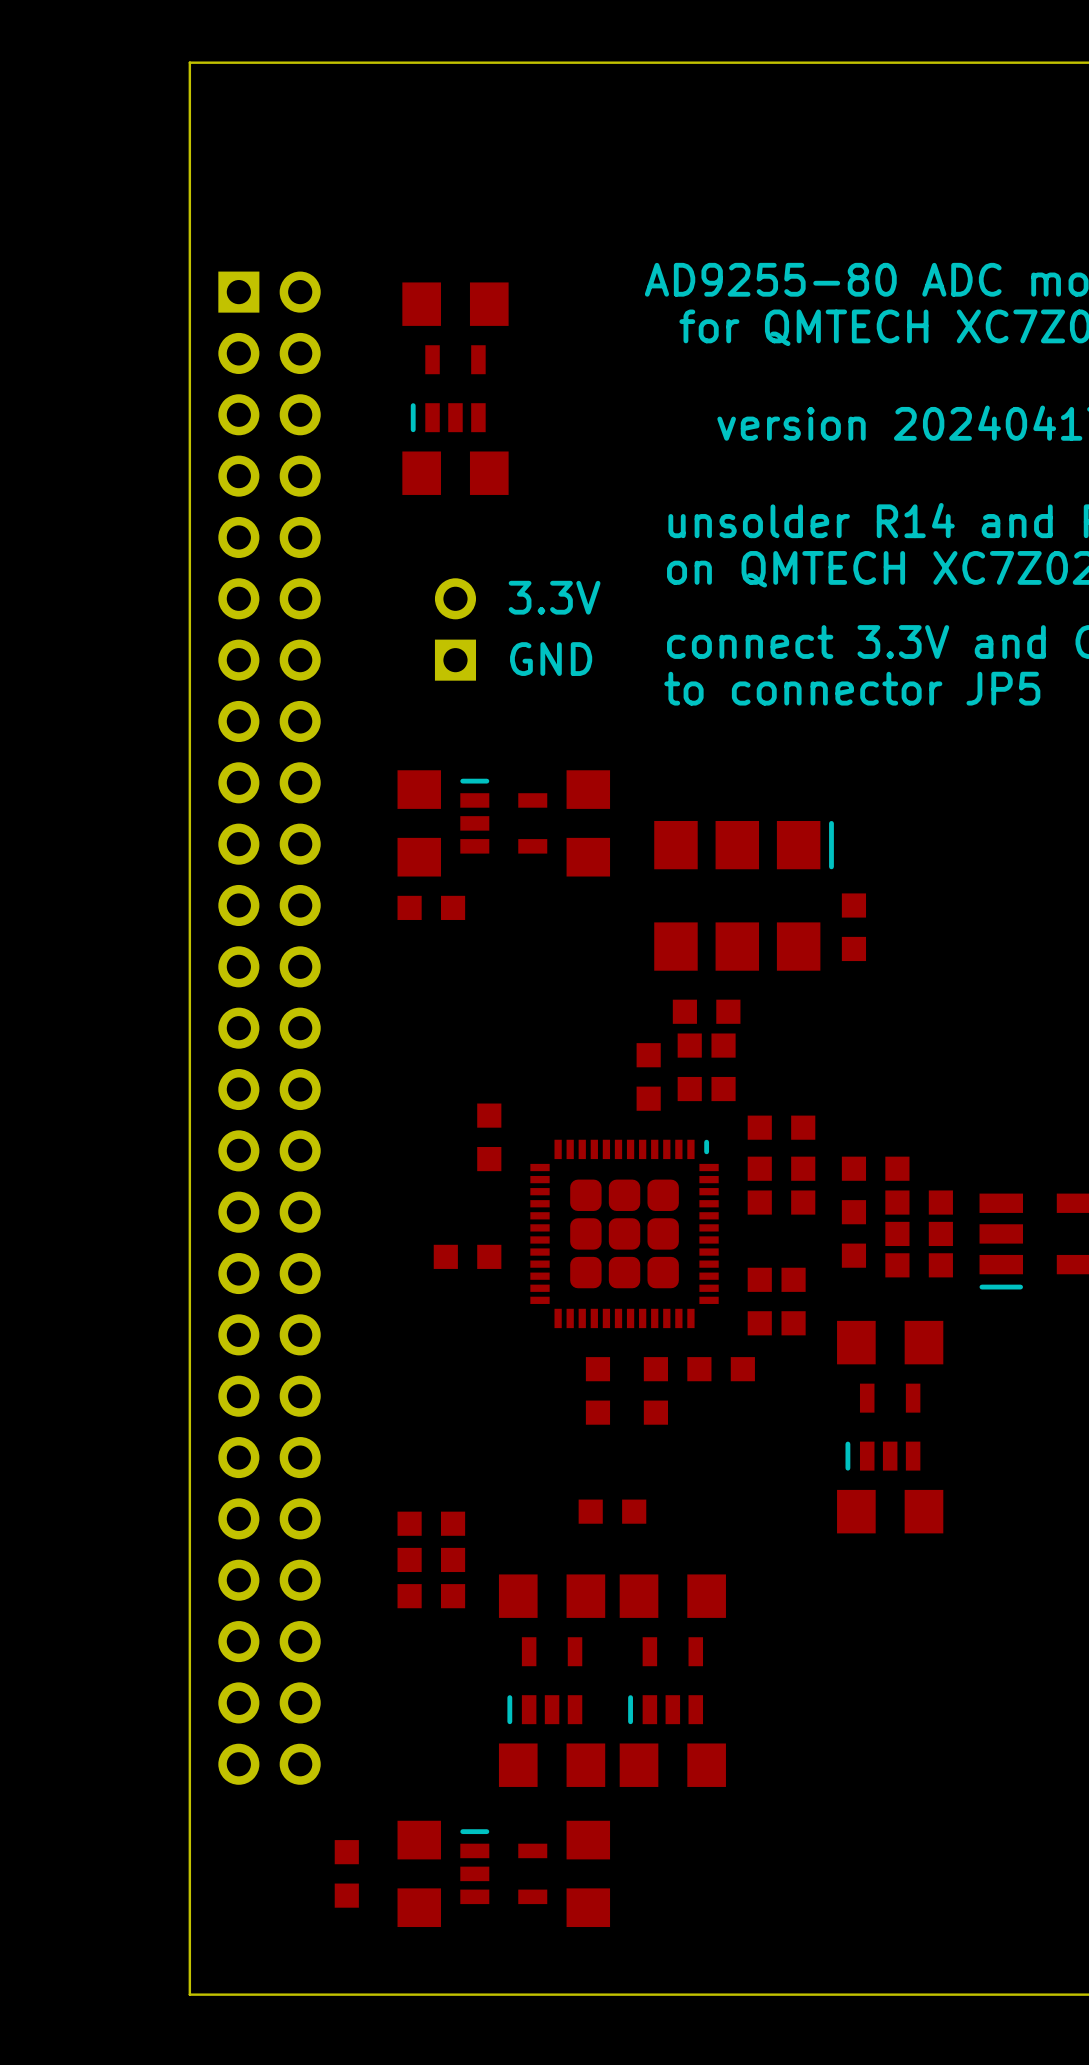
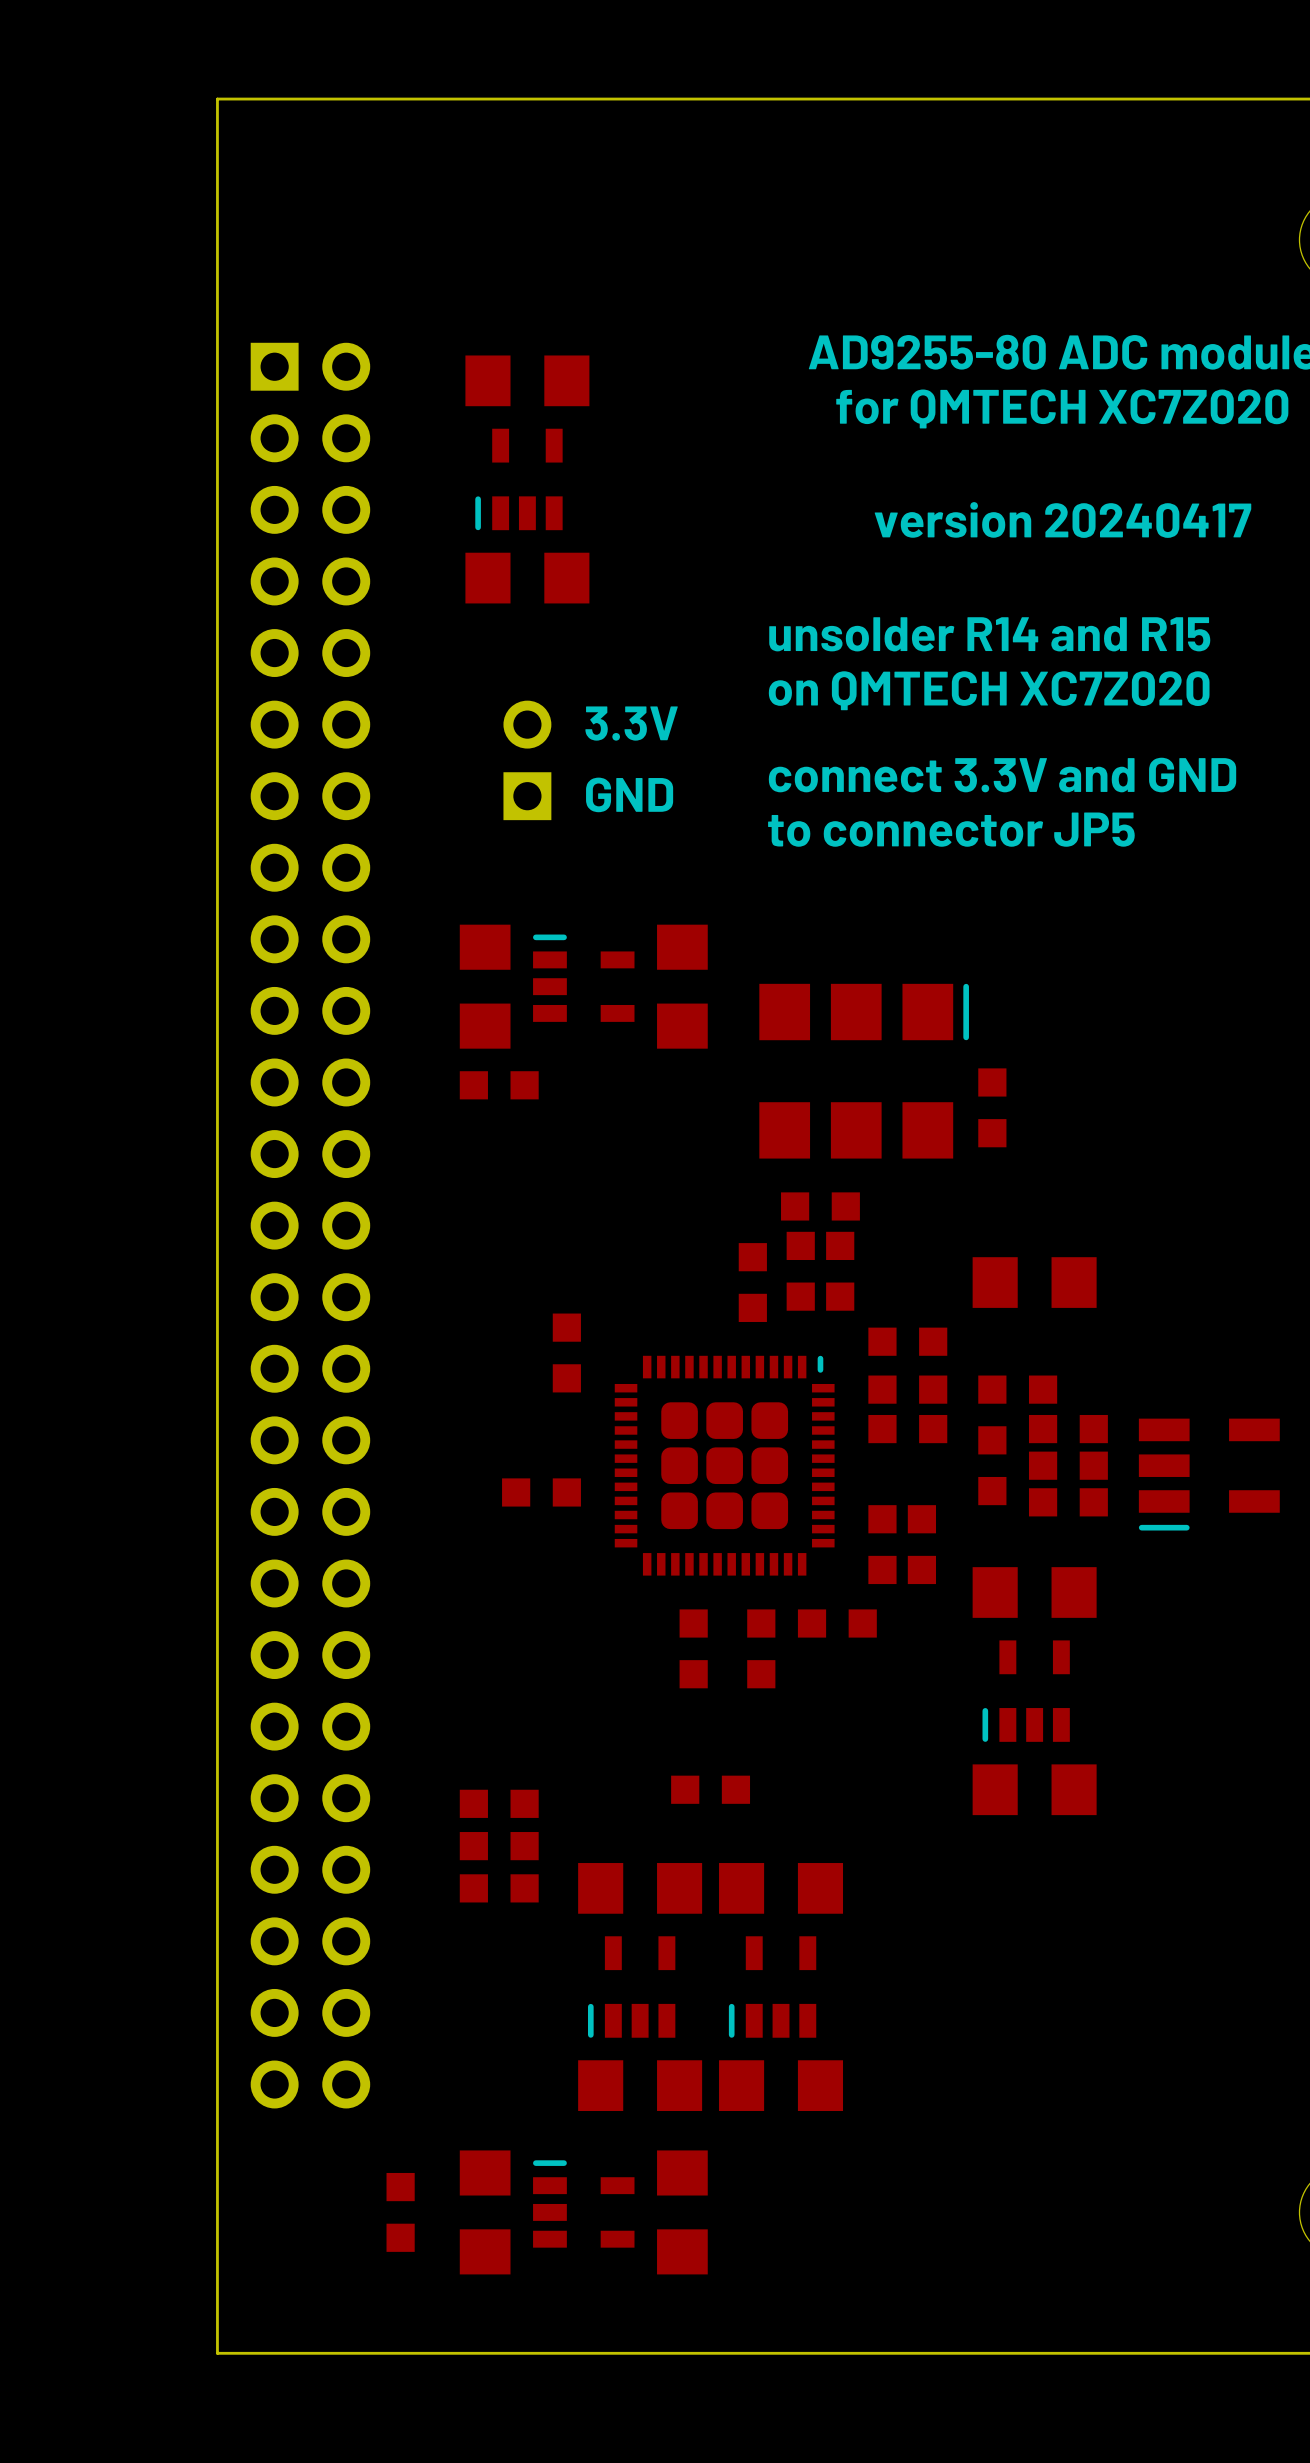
part: none -> (1034, 1282)

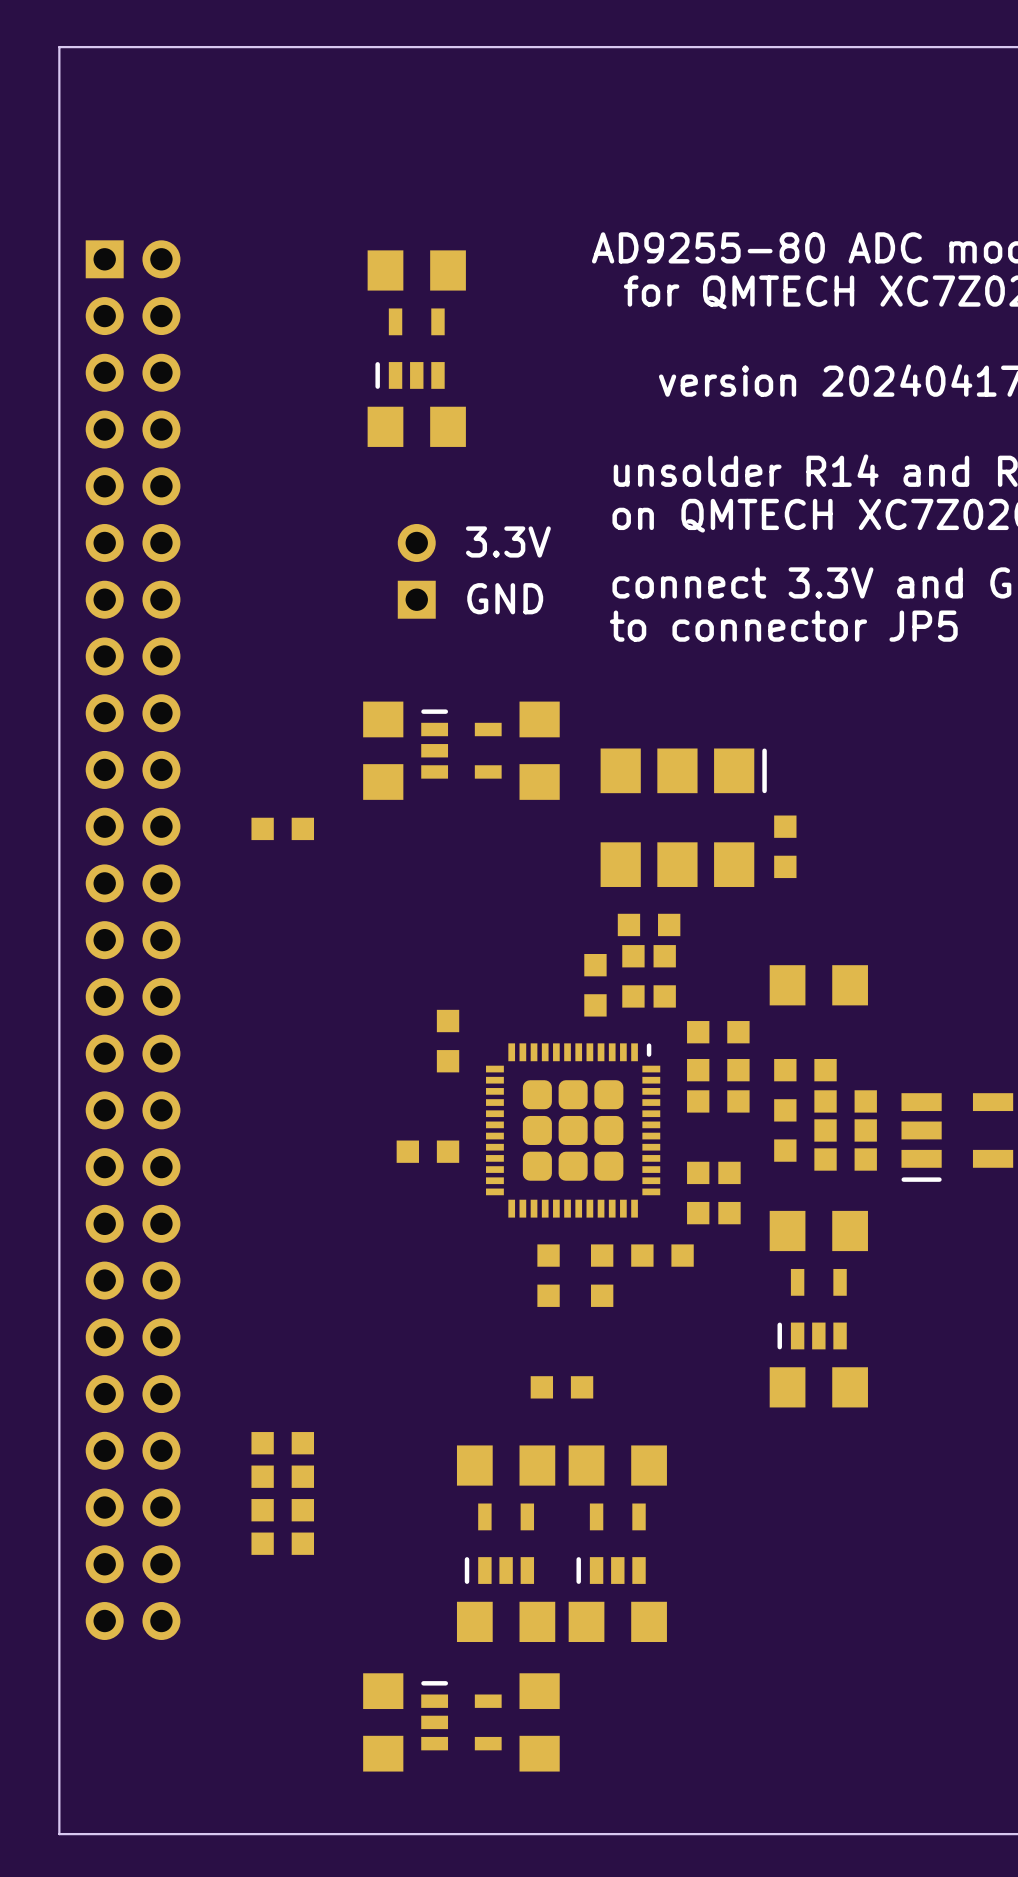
board edge: (217, 99) (217, 2353) -> (171, 47) (59, 47) (59, 1834) (171, 1834)
part position: (499, 1085) -> (282, 828)
part position: (310, 1225) -> (133, 940)
part: (499, 1803) -> none
part: (499, 1846) -> none
part: none -> (282, 1443)
part: (499, 1888) -> none
part: none -> (282, 1476)
part: none -> (282, 1510)
part: none -> (282, 1543)
part: (400, 2212) -> none

